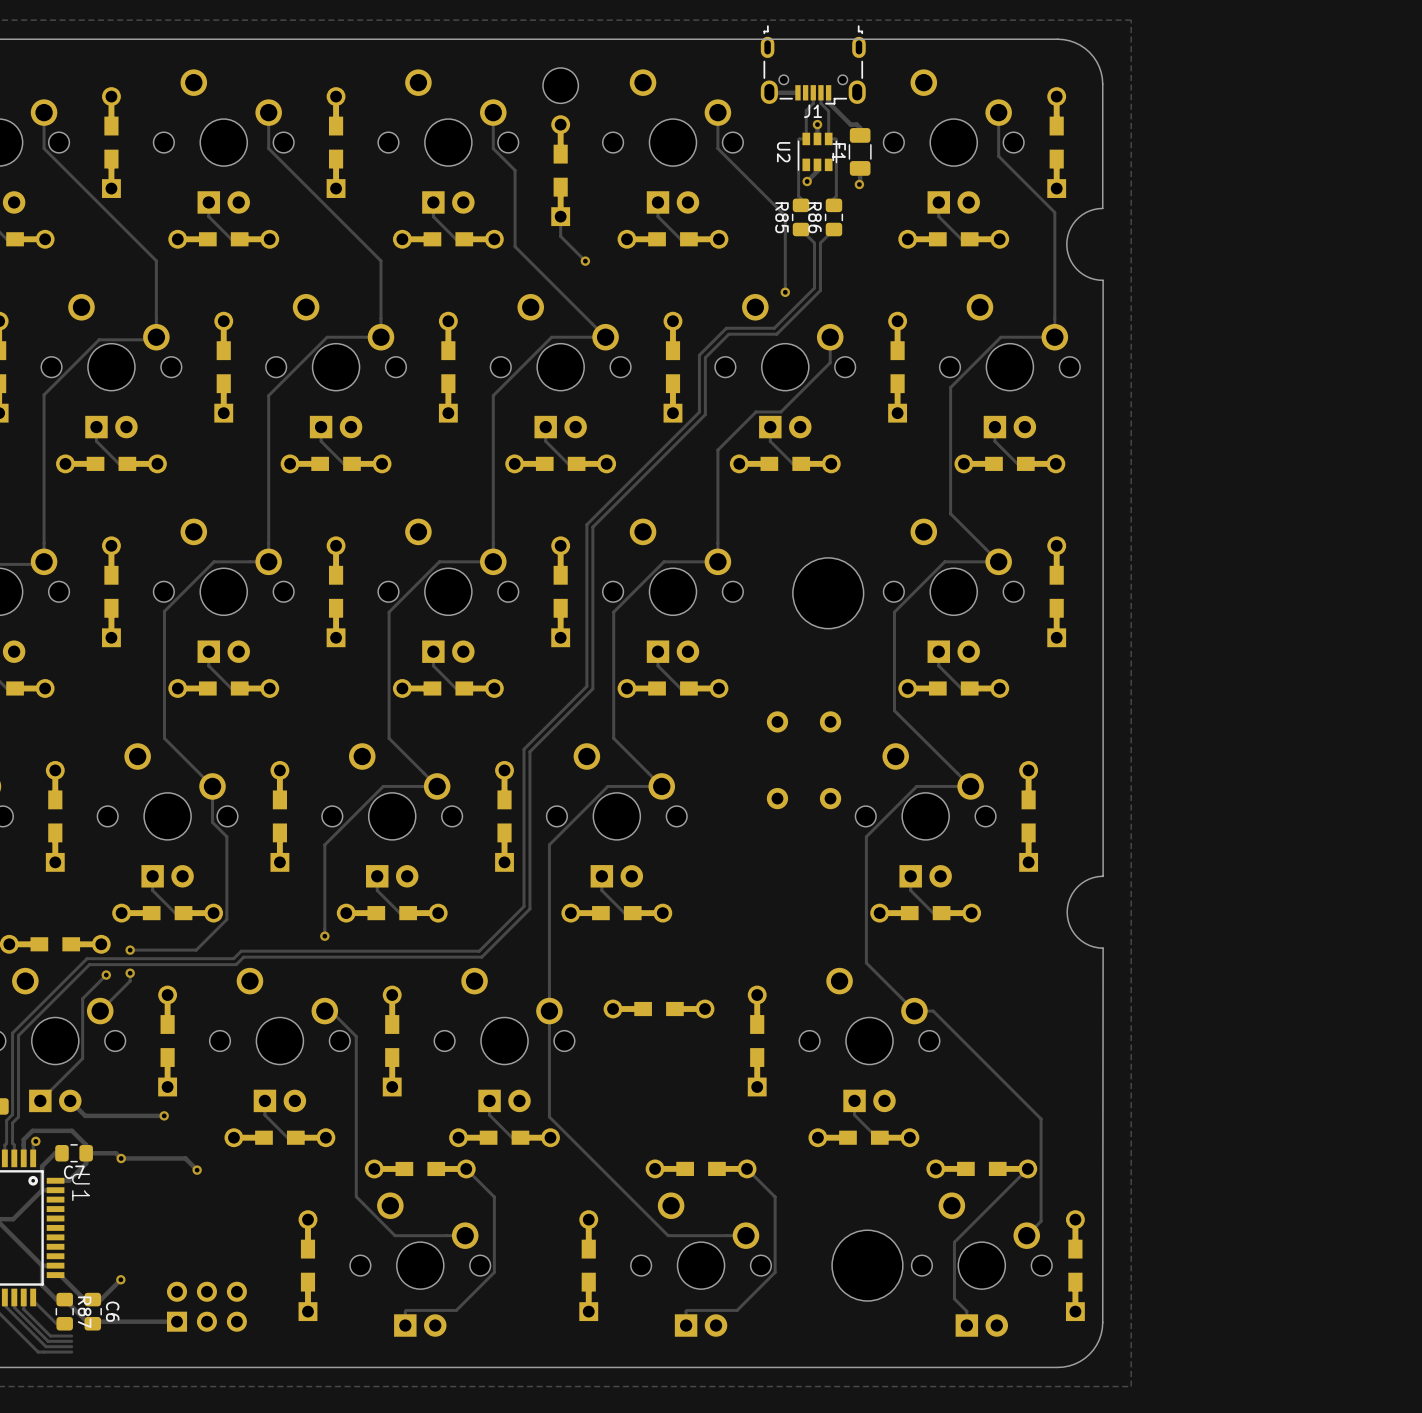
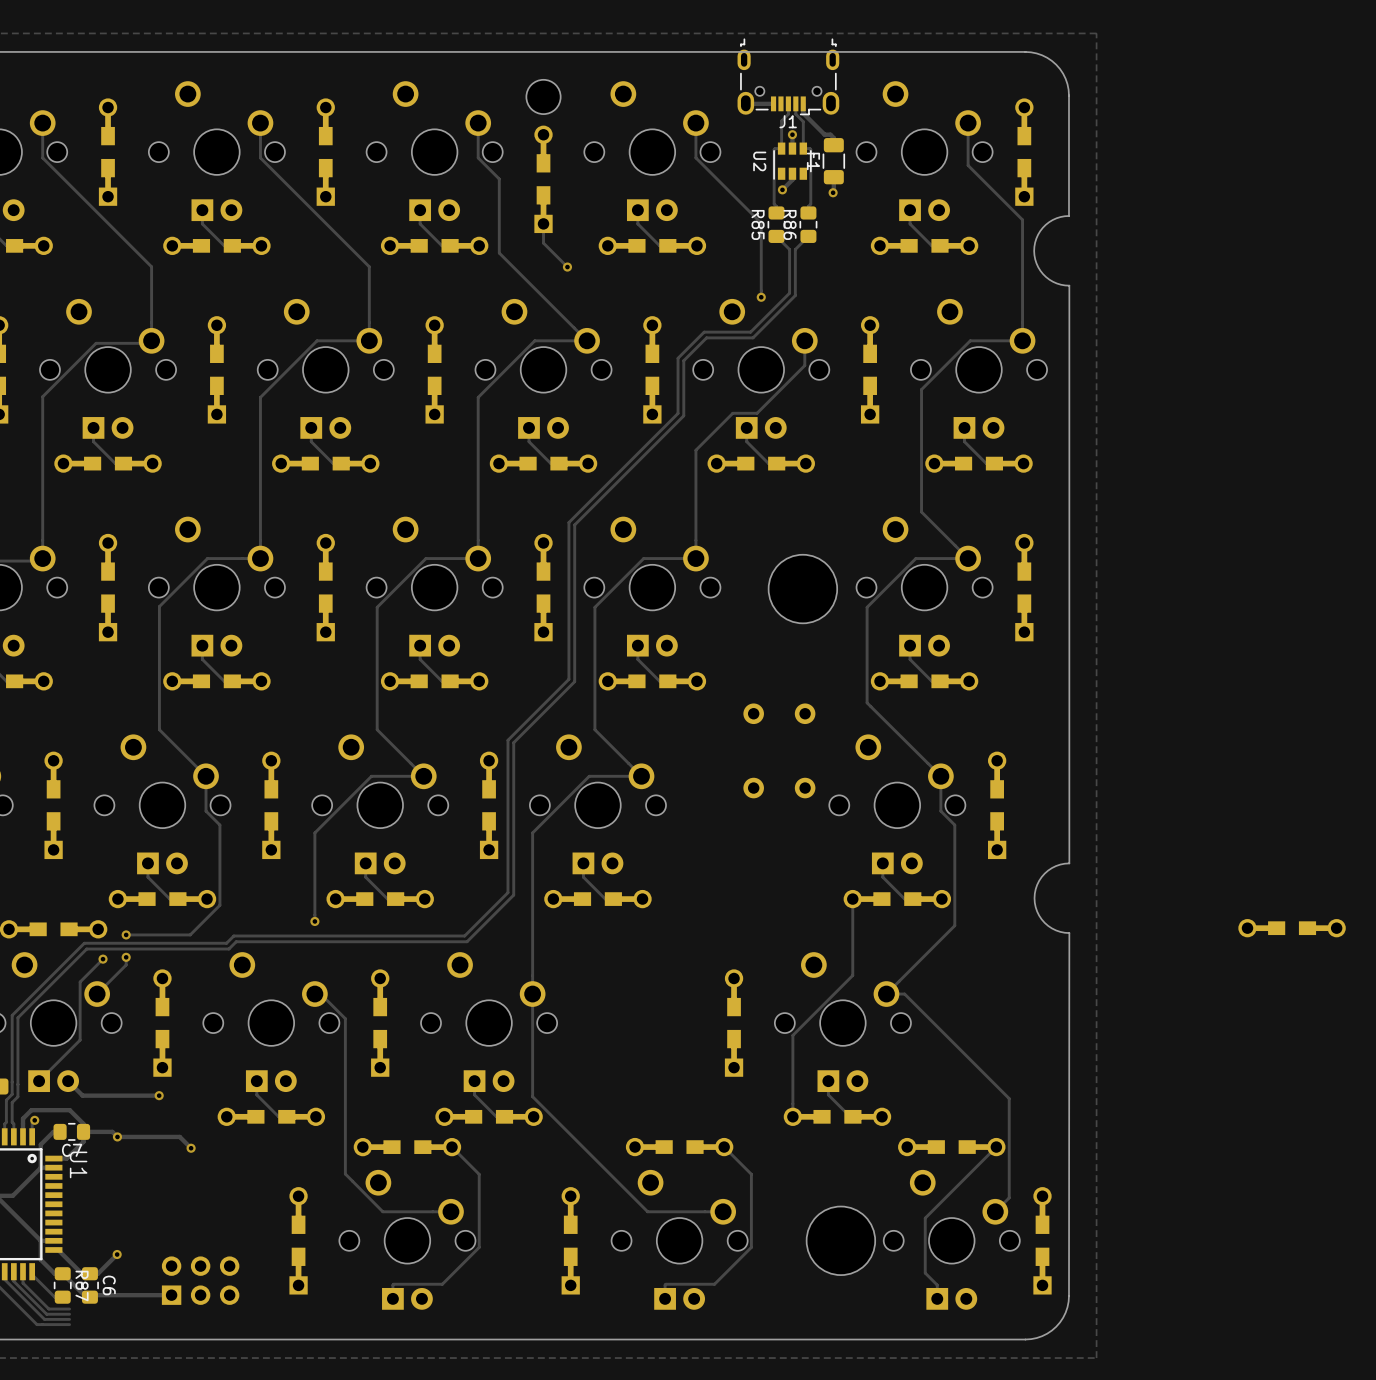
track: (970, 786) (916, 786) (866, 836) (866, 963) (914, 1011) -> (940, 776) (940, 811) (954, 825) (954, 925) (886, 994)
track: none -> (852, 899) (852, 975) (792, 1035) (792, 1116)
part: none -> (1292, 928)
part: (659, 1009) -> none

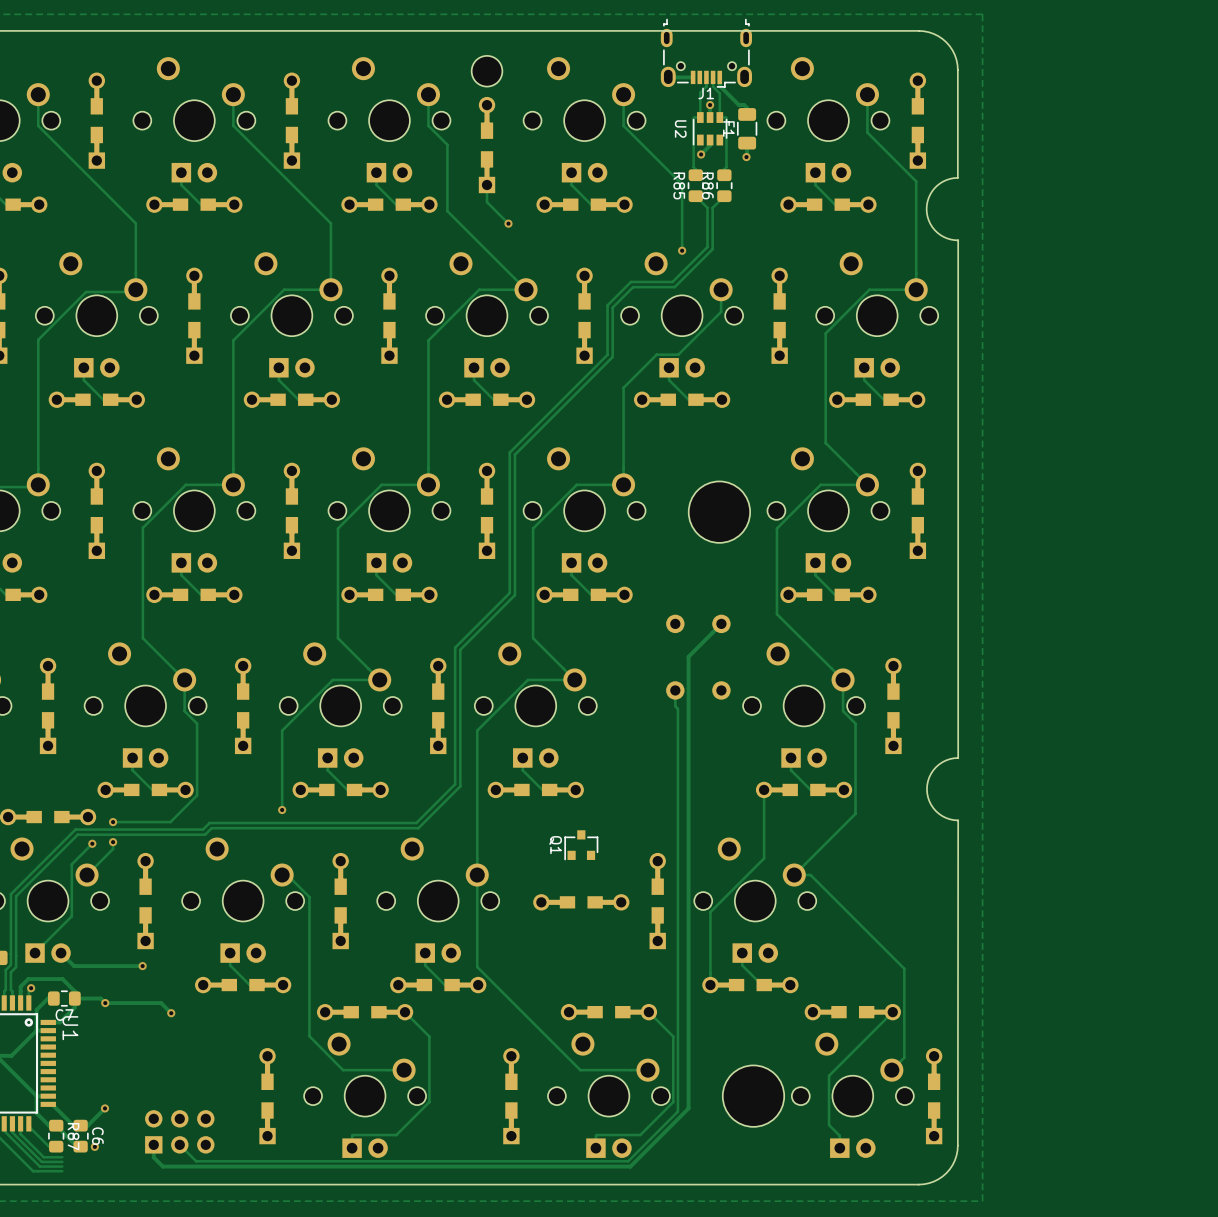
track: none -> (675, 690) (675, 706) (677, 708) (677, 1111) (628, 1161) (196, 1161) (179, 1144)
part: (1292, 928) -> none
Q1: none -> (581, 845)
part: none -> (581, 902)
track: (171, 1295) (91, 1295) -> (153, 1144) (153, 1157) (162, 1166) (630, 1166) (688, 1108) (688, 656) (721, 623)
via: none -> (94, 1146)

